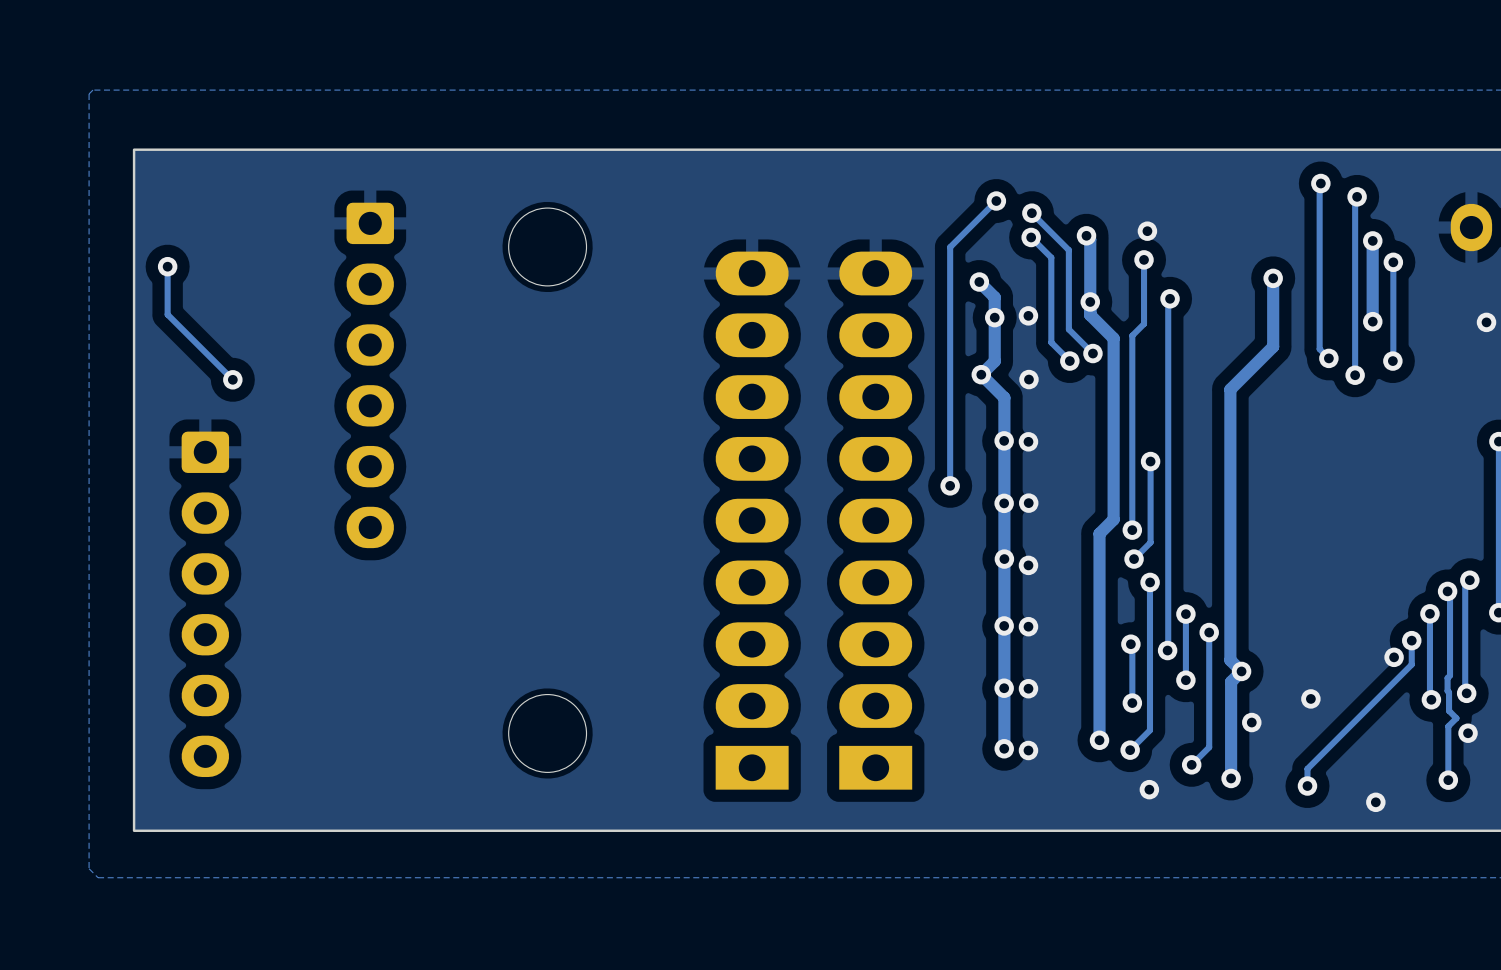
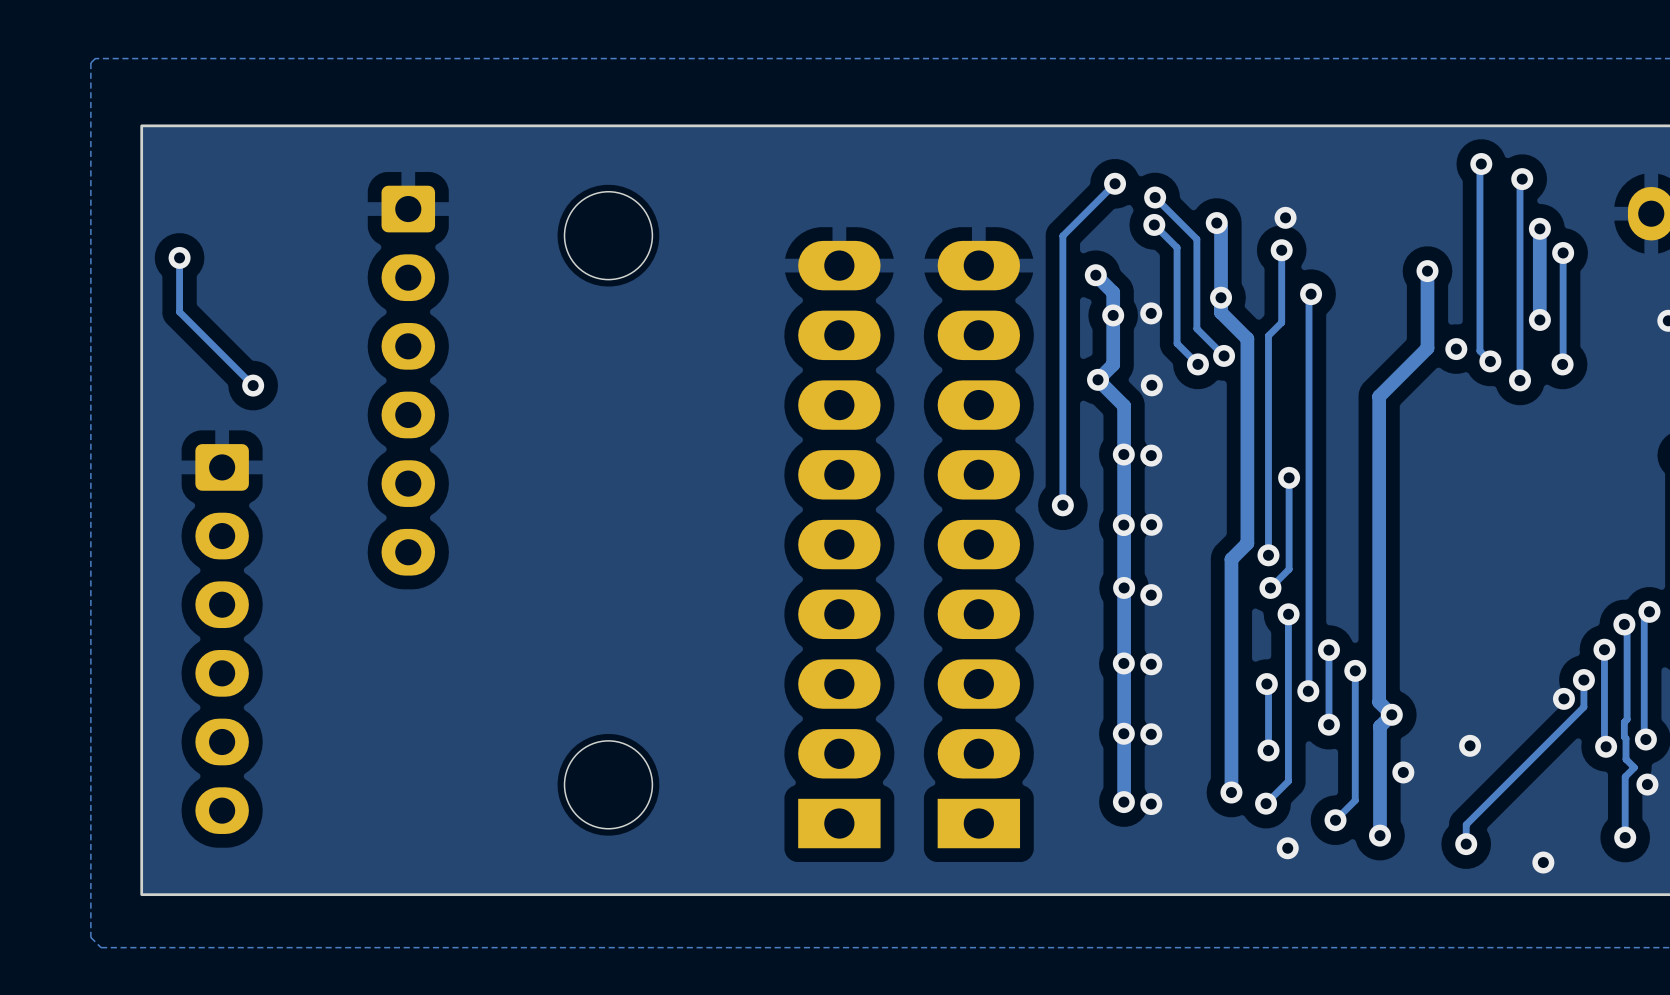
via: none -> (1456, 349)

